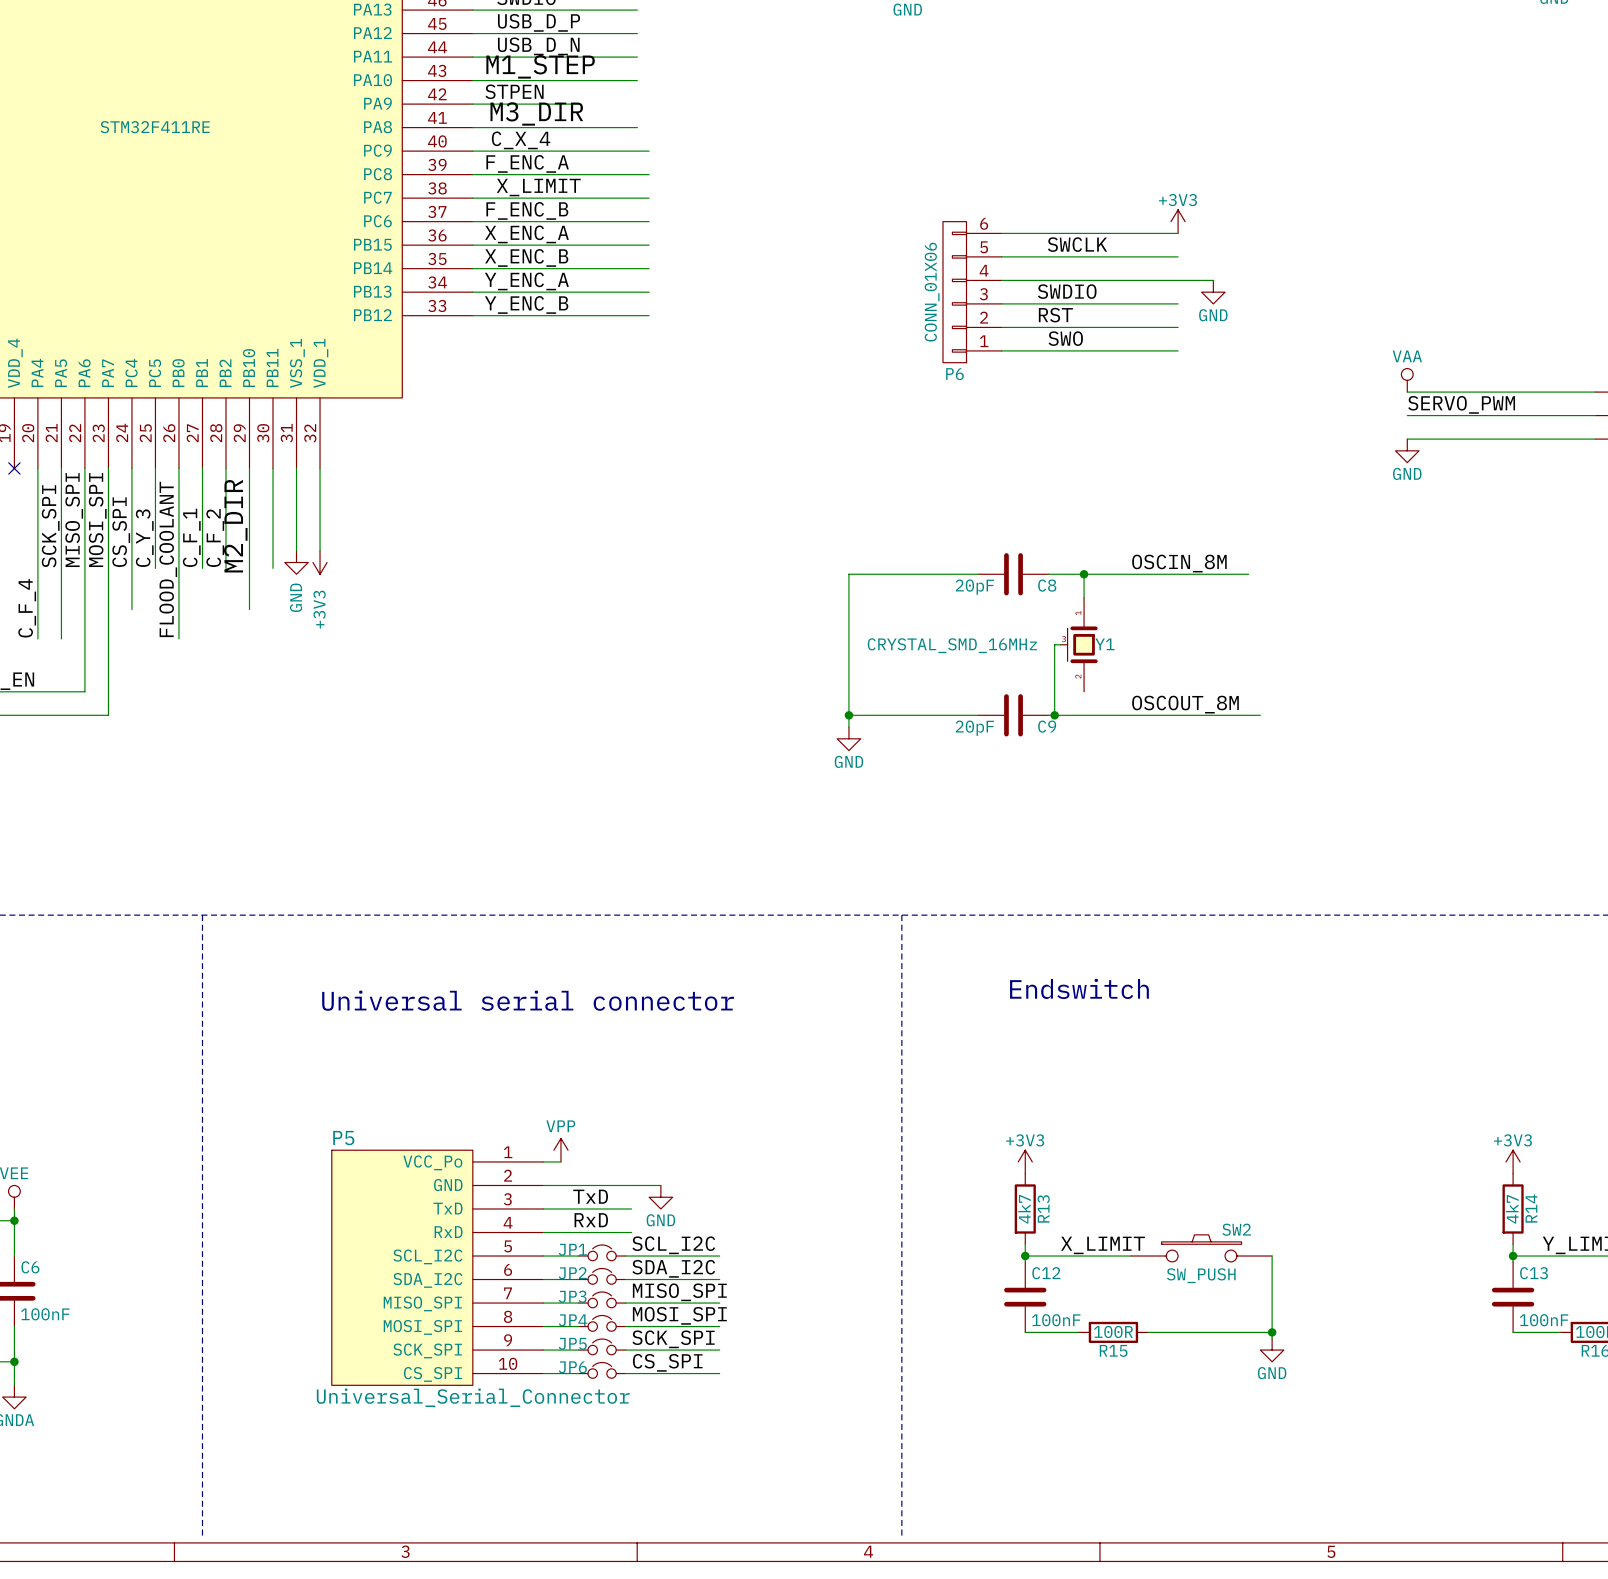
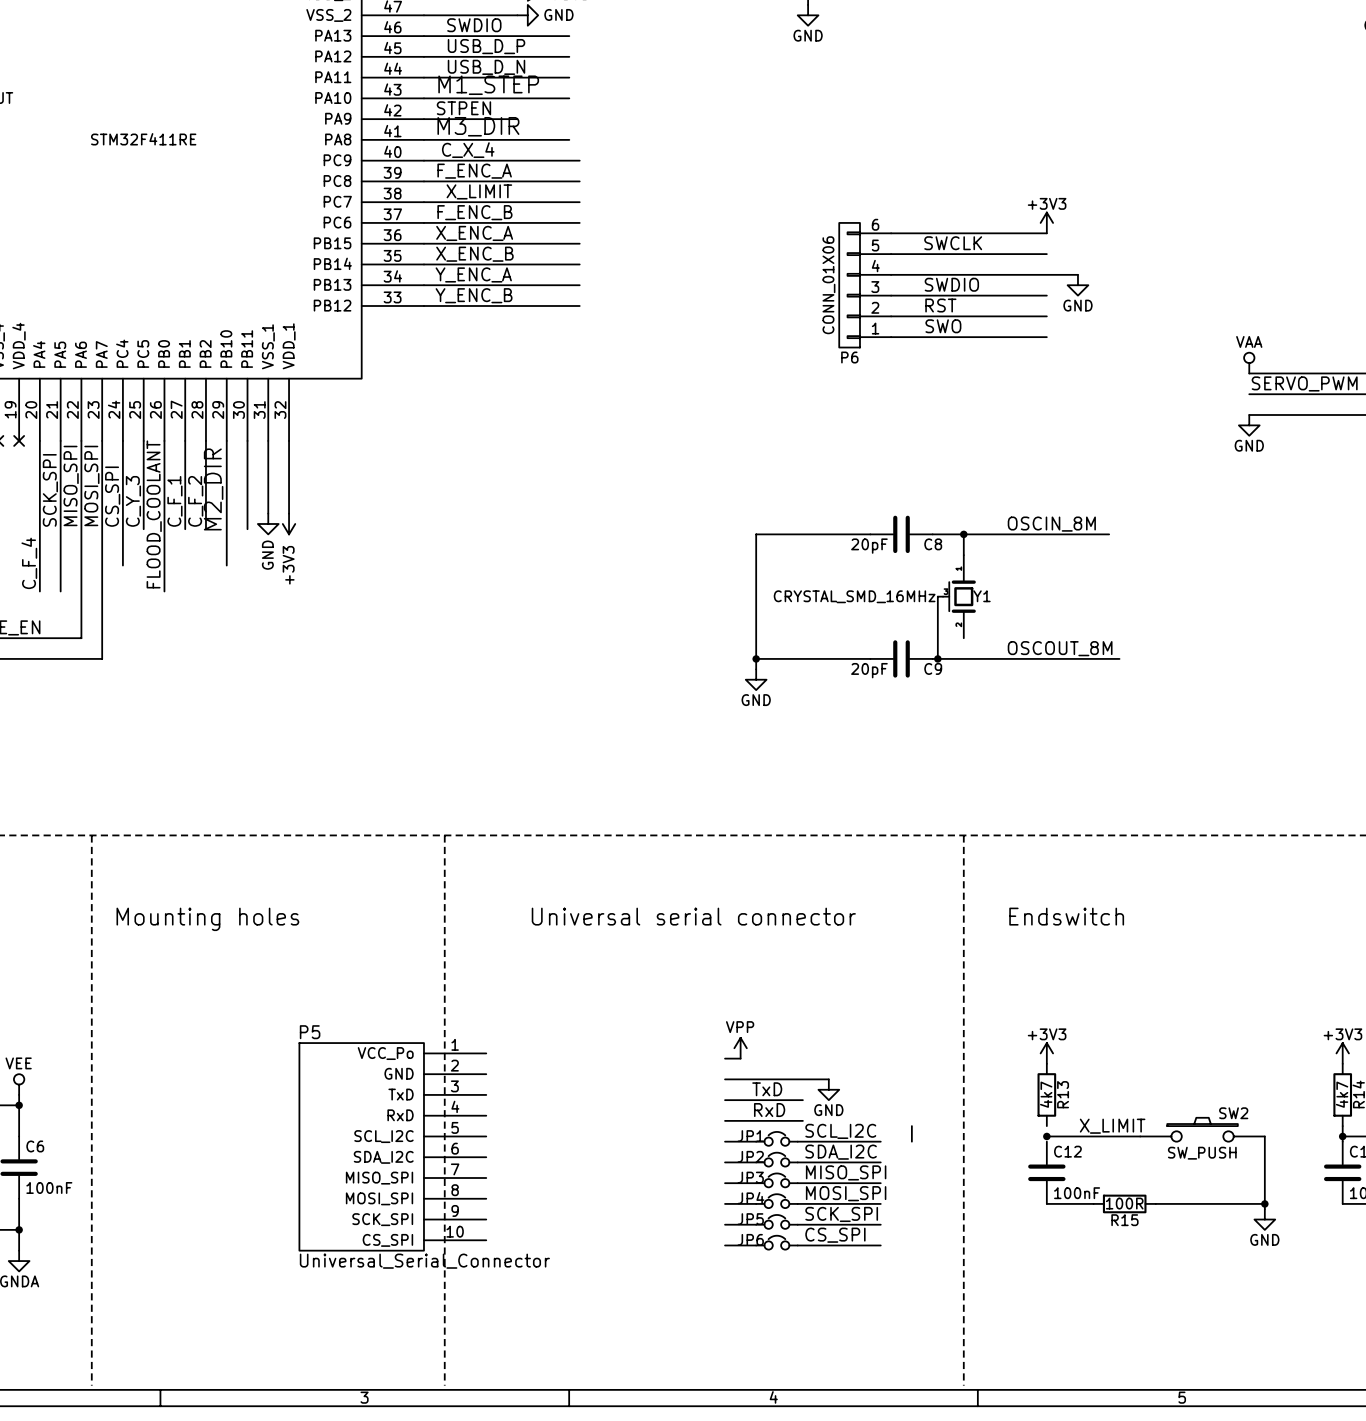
line: (202, 915) (202, 1538) -> (91, 835) (91, 1385)
line: none -> (444, 835) (444, 1385)
line: (901, 915) (901, 1538) -> (963, 835) (963, 1385)
text position: Endswitch (1079, 988) -> Endswitch (1066, 916)
text: Universal serial connector (528, 1000) -> none
text: none -> Universal serial connector (693, 916)
text: none -> Mounting holes (207, 919)
power symbol: VPP (560, 1150) -> none
power symbol: none -> VPP (740, 1048)
wire: (543, 1161) (560, 1161) -> none
power symbol position: +3V3 (1025, 1161) -> +3V3 (1046, 1053)
wire: none -> (725, 1058) (740, 1058)
wire: (543, 1185) (660, 1185) -> none
wire: none -> (725, 1079) (828, 1079)
label: TxD (590, 1196) -> none
power symbol: GND (660, 1197) -> none
label: none -> TxD (767, 1089)
power symbol: none -> GND (828, 1089)
wire: (543, 1208) (631, 1208) -> none
R13 position: (1025, 1208) -> (1046, 1094)
wire: none -> (725, 1100) (802, 1100)
label: RxD (591, 1220) -> none
label: none -> RxD (769, 1110)
wire: (543, 1232) (631, 1232) -> none
wire: none -> (725, 1120) (802, 1120)
label: SCL_I2C (673, 1245) -> none
label position: X_LIMIT (1102, 1245) -> X_LIMIT (1112, 1126)
SW2 position: (1201, 1248) -> (1202, 1129)
label: none -> SCL_I2C (840, 1131)
JP1 position: (602, 1252) -> (776, 1138)
wire: (543, 1256) (578, 1256) -> none
wire: (625, 1256) (719, 1256) -> none
wire: (1025, 1256) (1131, 1256) -> (1046, 1136) (1140, 1136)
junction: (1025, 1256) -> none
junction: none -> (1046, 1136)
wire: (1272, 1256) (1272, 1338) -> (1264, 1136) (1264, 1209)
wire: none -> (725, 1141) (756, 1141)
wire: none -> (797, 1141) (880, 1141)
label: SDA_I2C (673, 1268) -> none
label: none -> SDA_I2C (841, 1152)
JP2 position: (602, 1276) -> (776, 1159)
wire: (543, 1279) (578, 1279) -> none
wire: (625, 1279) (719, 1279) -> none
wire: none -> (725, 1162) (756, 1162)
wire: none -> (797, 1162) (880, 1162)
label: MISO_SPI (679, 1292) -> none
C12 position: (1025, 1297) -> (1046, 1172)
label: none -> MISO_SPI (846, 1172)
JP3 position: (602, 1299) -> (776, 1180)
wire: (543, 1303) (578, 1303) -> none
wire: (625, 1303) (719, 1303) -> none
wire: none -> (725, 1183) (756, 1183)
wire: none -> (797, 1183) (880, 1183)
label: MOSI_SPI (679, 1315) -> none
label: none -> MOSI_SPI (846, 1193)
JP4 position: (602, 1323) -> (776, 1201)
wire: (543, 1326) (578, 1326) -> none
wire: (625, 1326) (719, 1326) -> none
wire: none -> (725, 1203) (756, 1203)
wire: none -> (797, 1203) (880, 1203)
wire: (1025, 1332) (1078, 1332) -> none
R15 position: (1113, 1332) -> (1124, 1203)
wire: (1148, 1332) (1178, 1332) -> none
junction: (1272, 1332) -> none
wire: none -> (1155, 1203) (1264, 1203)
junction: none -> (1264, 1203)
label: SCK_SPI (673, 1339) -> none
label: none -> SCK_SPI (841, 1214)
JP5 position: (602, 1346) -> (776, 1221)
wire: (543, 1350) (578, 1350) -> none
wire: (625, 1350) (719, 1350) -> none
power symbol position: GND (1272, 1350) -> GND (1264, 1219)
wire: none -> (725, 1224) (756, 1224)
wire: none -> (797, 1224) (880, 1224)
label: CS_SPI (667, 1362) -> none
label: none -> CS_SPI (835, 1235)
JP6 position: (602, 1370) -> (776, 1242)
wire: (543, 1373) (578, 1373) -> none
wire: (625, 1373) (719, 1373) -> none
wire: none -> (725, 1245) (756, 1245)
wire: none -> (797, 1245) (880, 1245)

